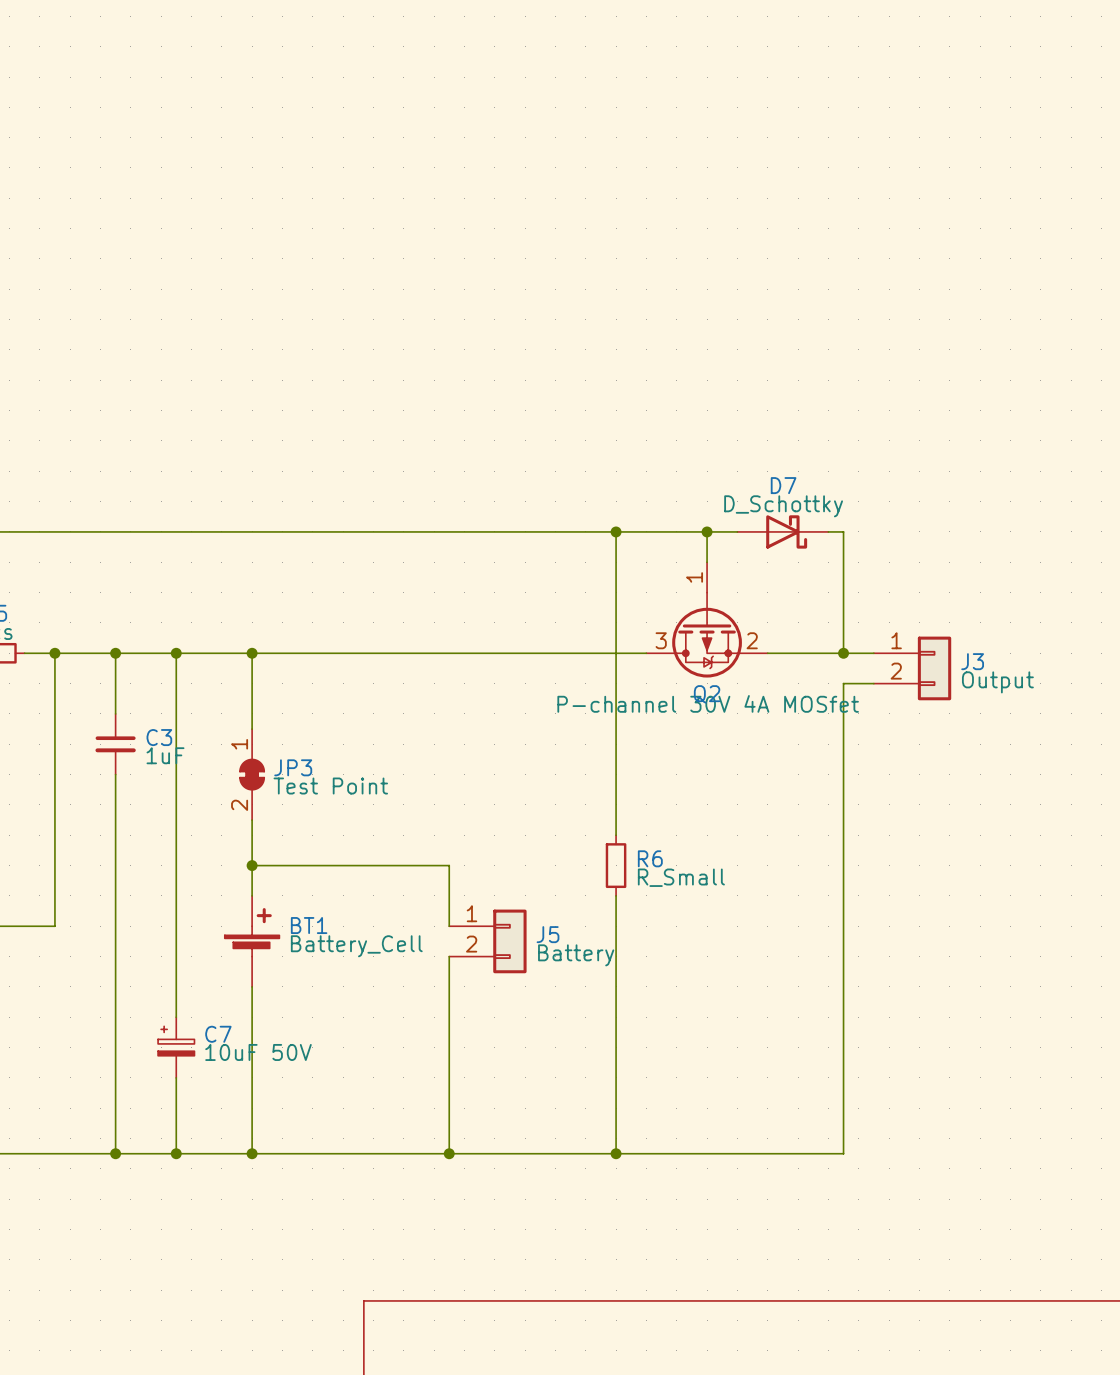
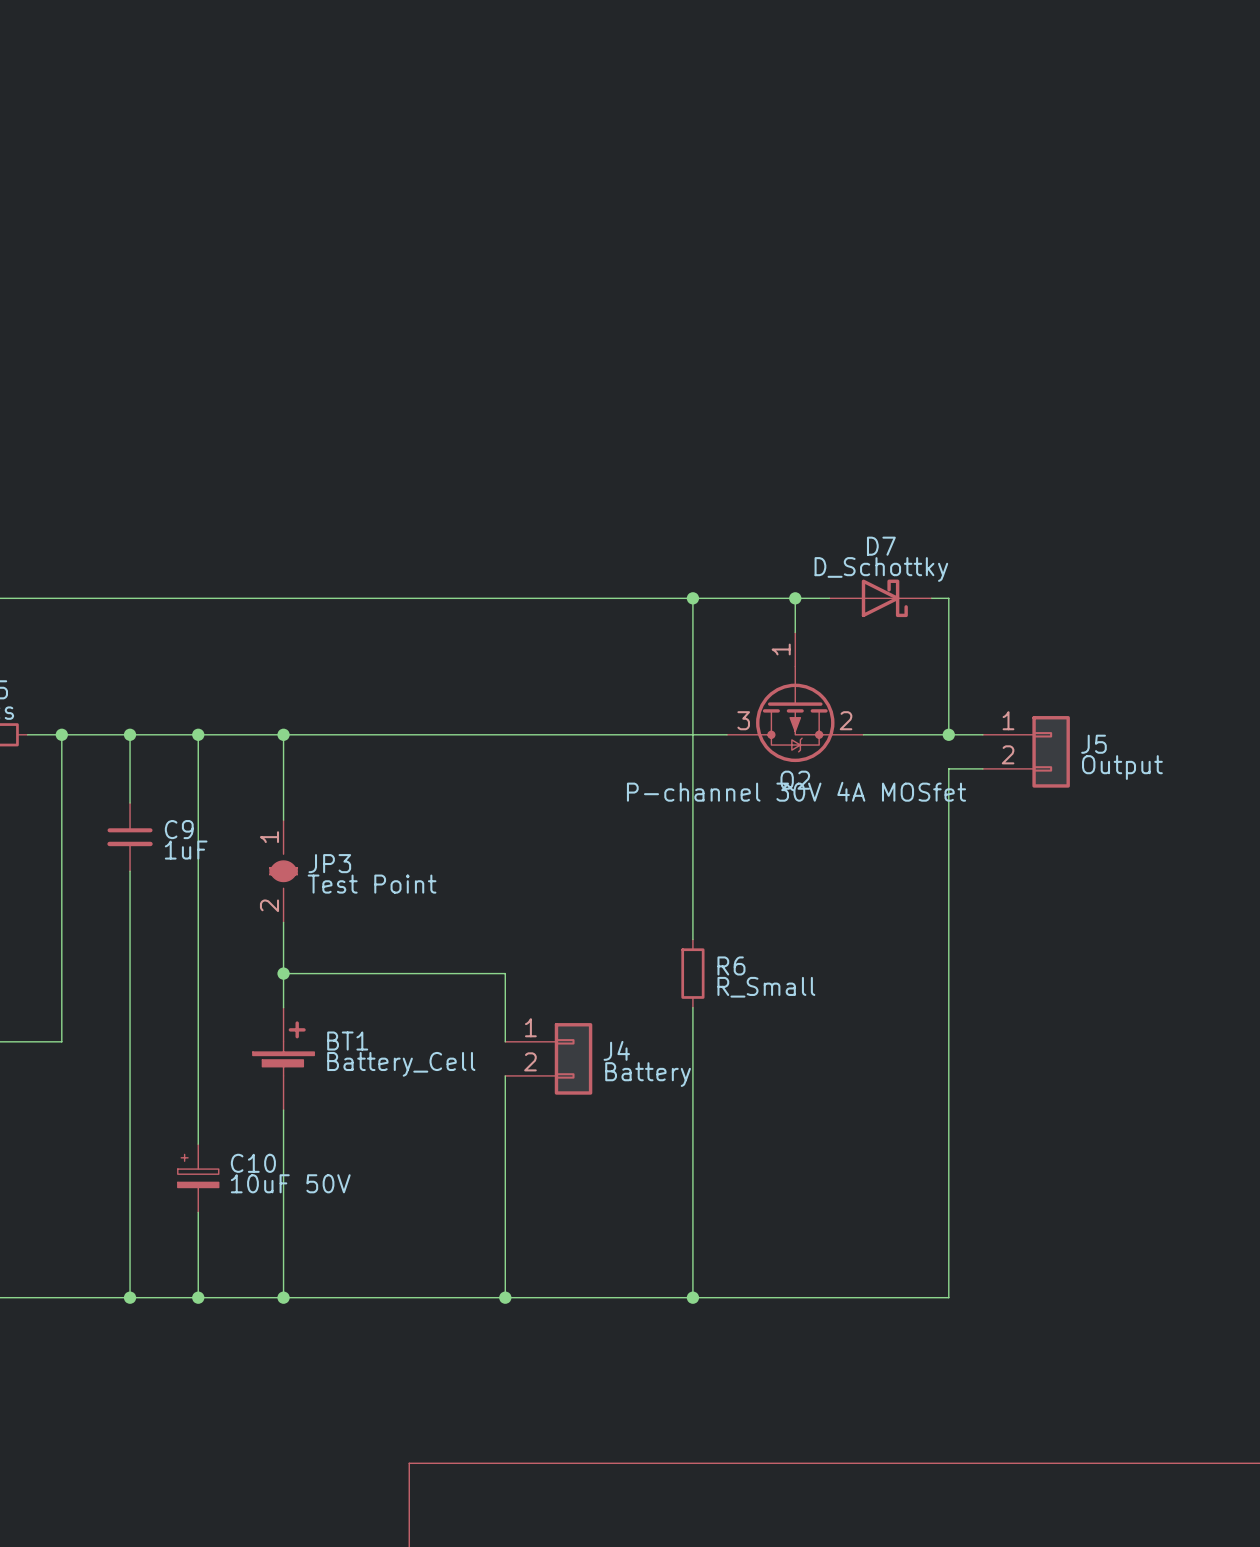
J3 name: J3 (972, 661) -> J5 (1093, 744)
JP3 symbol: [239, 729, 265, 821] -> [269, 820, 298, 923]
C3 name: C3 (159, 737) -> C9 (179, 829)
J5 name: J5 (548, 934) -> J4 (616, 1050)
C7 name: C7 (218, 1034) -> C10 (253, 1163)

